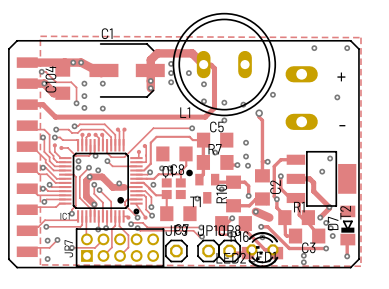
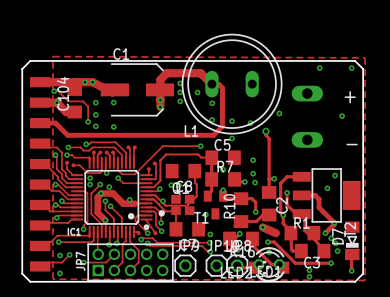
track: (186, 165) (180, 171) (180, 182) -> none
drawing position: (189, 172) -> (161, 213)
track: (180, 174) (158, 174) (154, 178) (145, 178) -> (194, 182) (196, 184) (196, 196) (187, 205) (165, 205) (155, 195)
via position: (221, 189) -> (223, 190)
via: none -> (210, 234)

